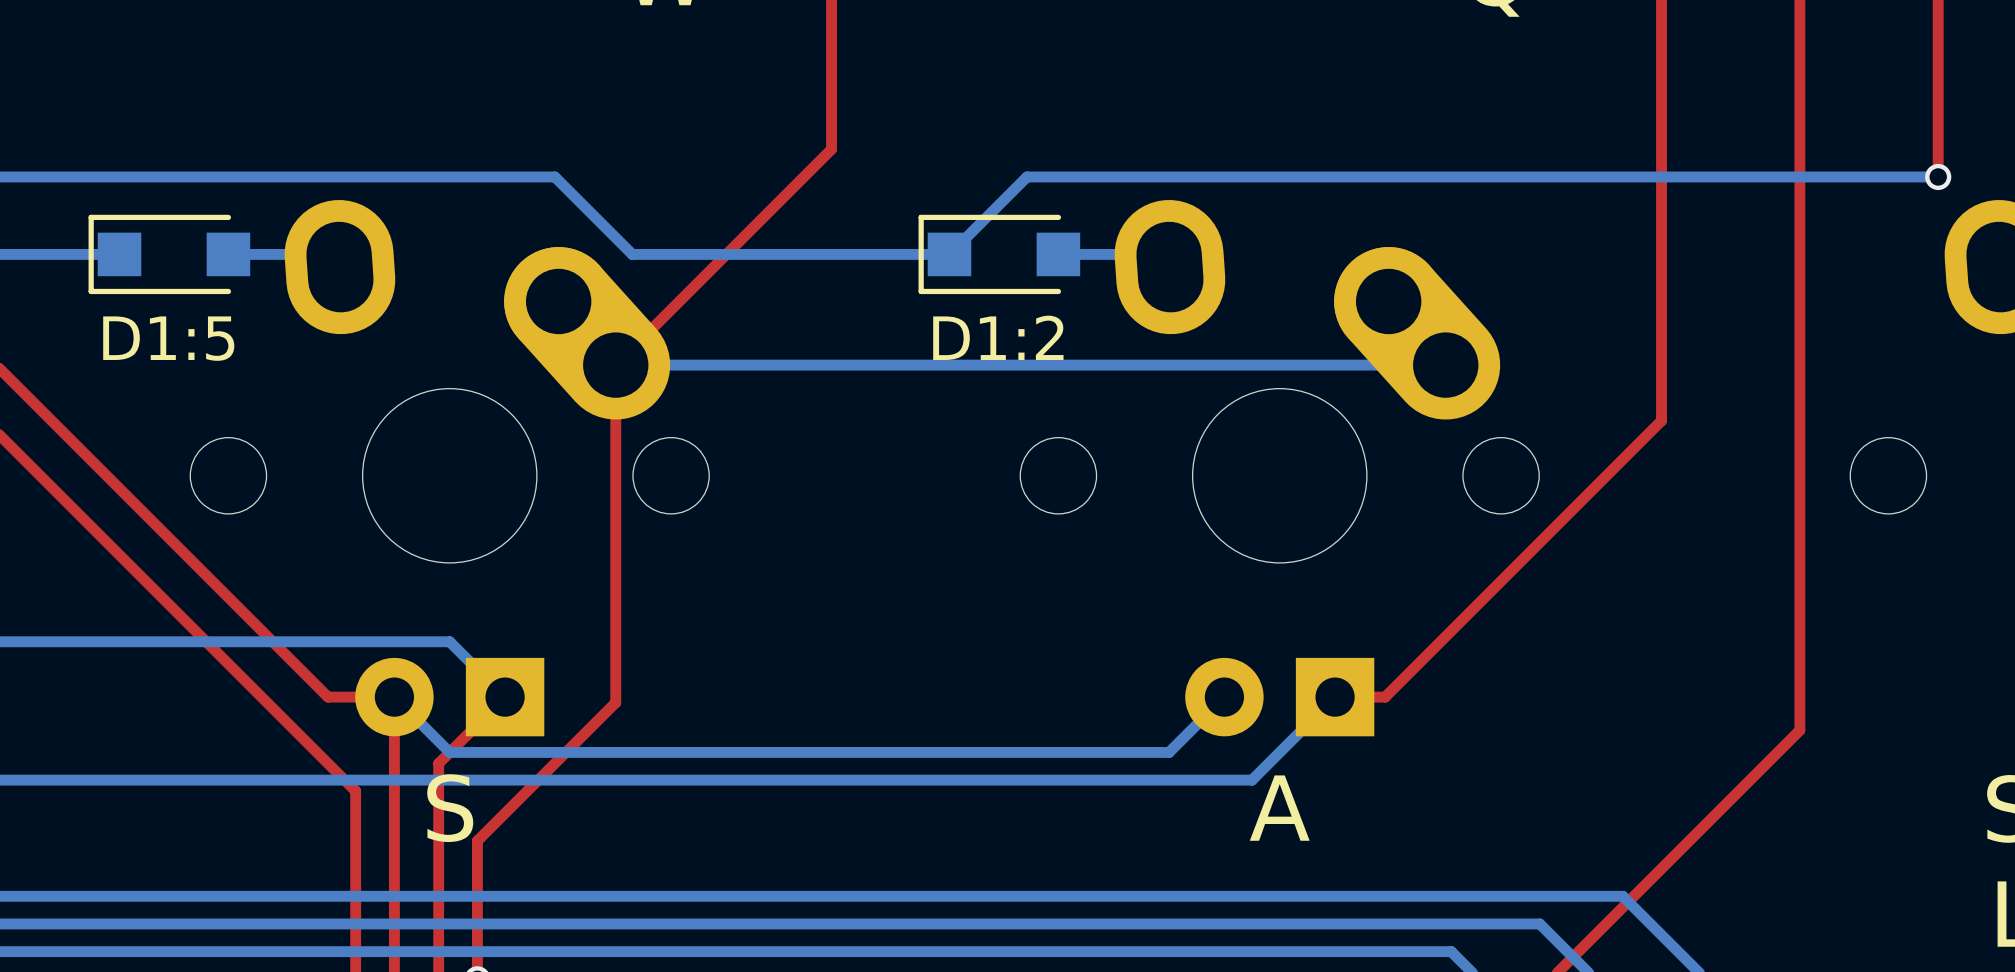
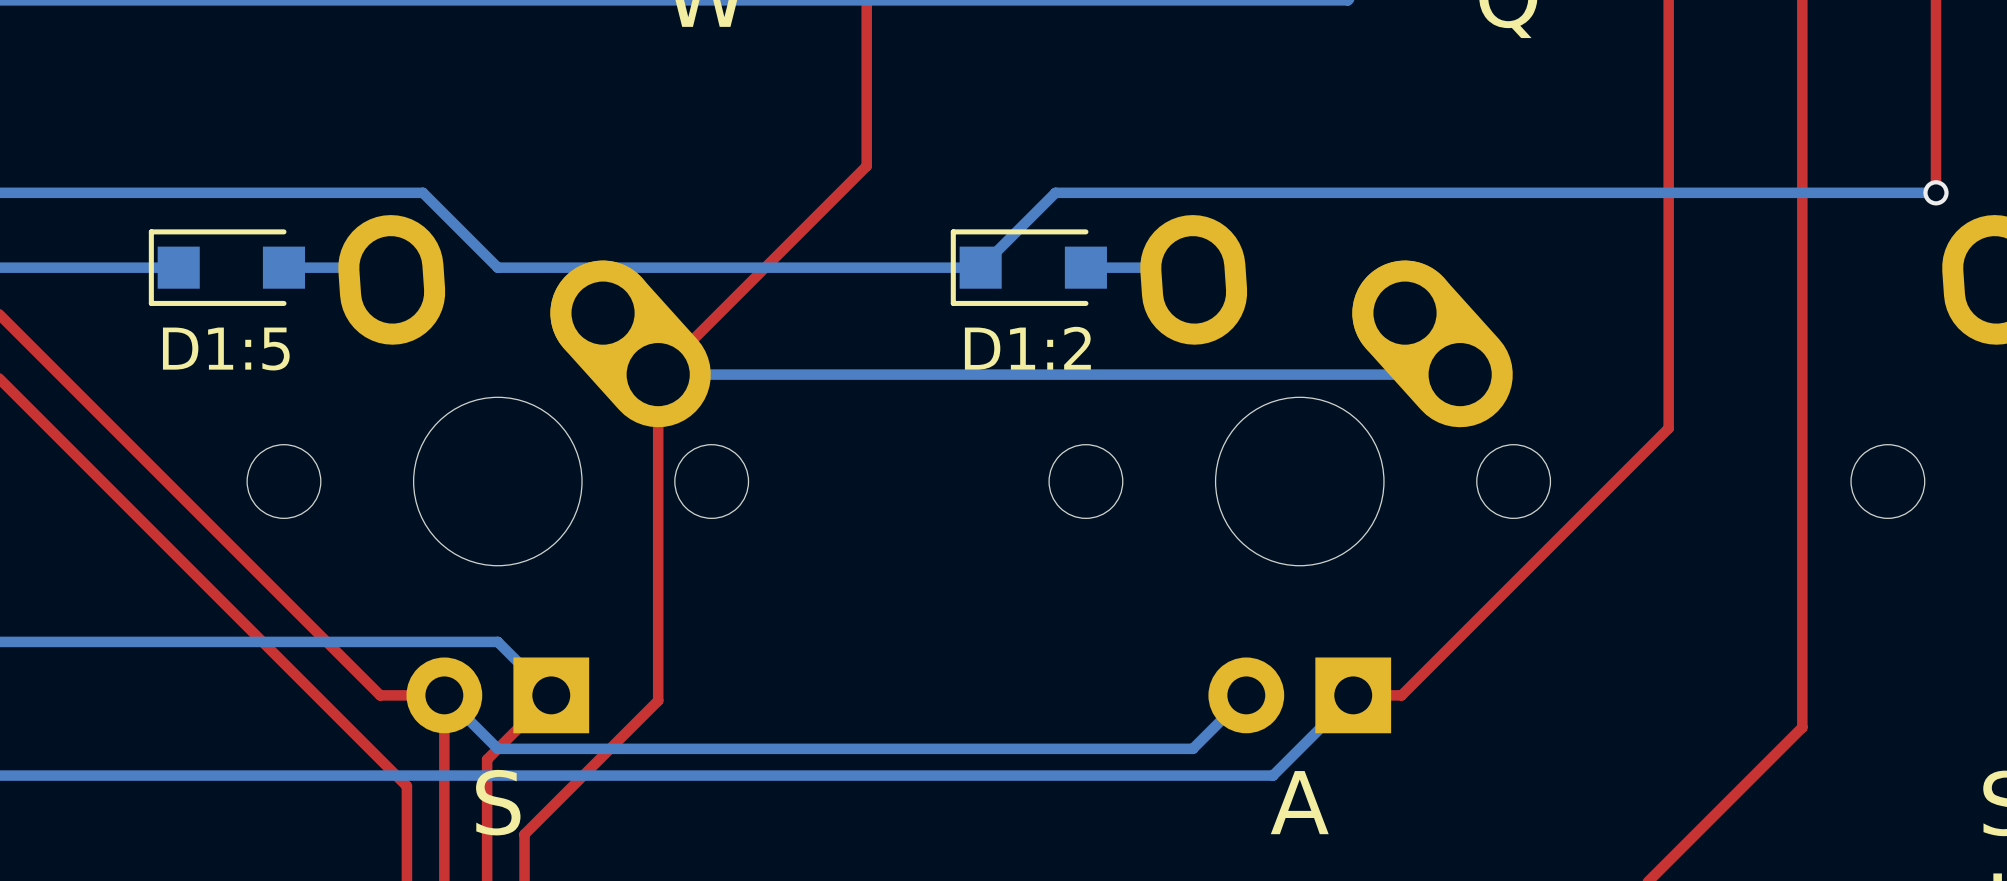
bottom track: (372, 176) (554, 176) (632, 254) -> (422, 192) (497, 267) (674, 267)

